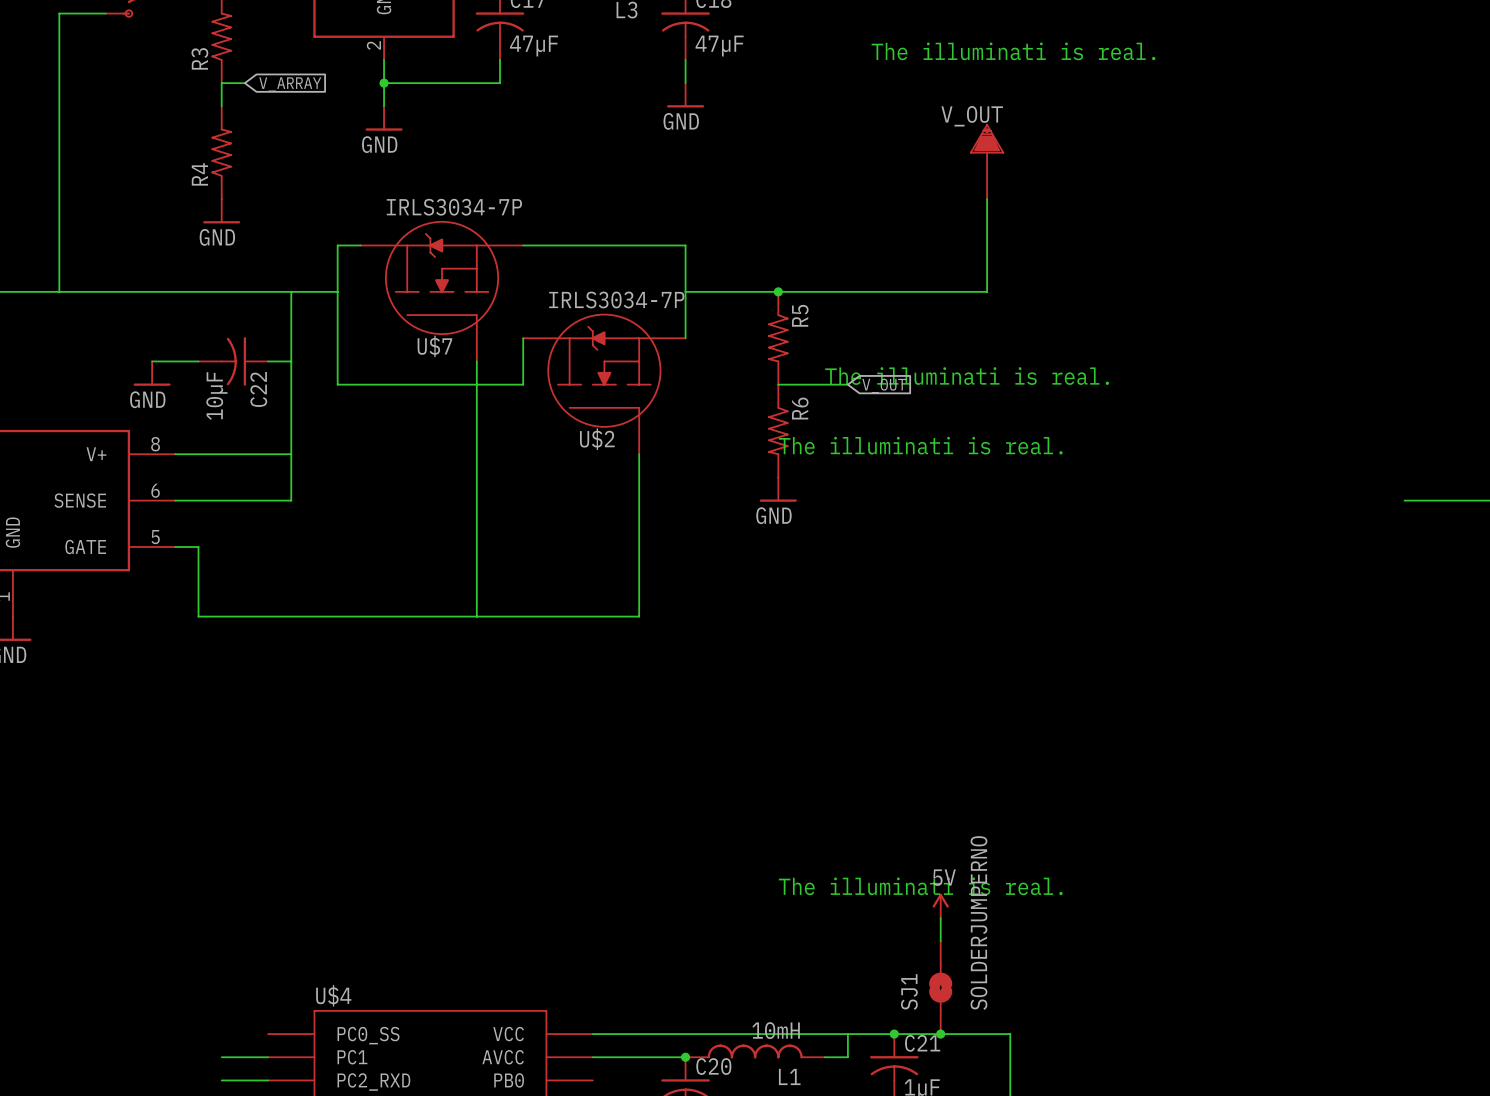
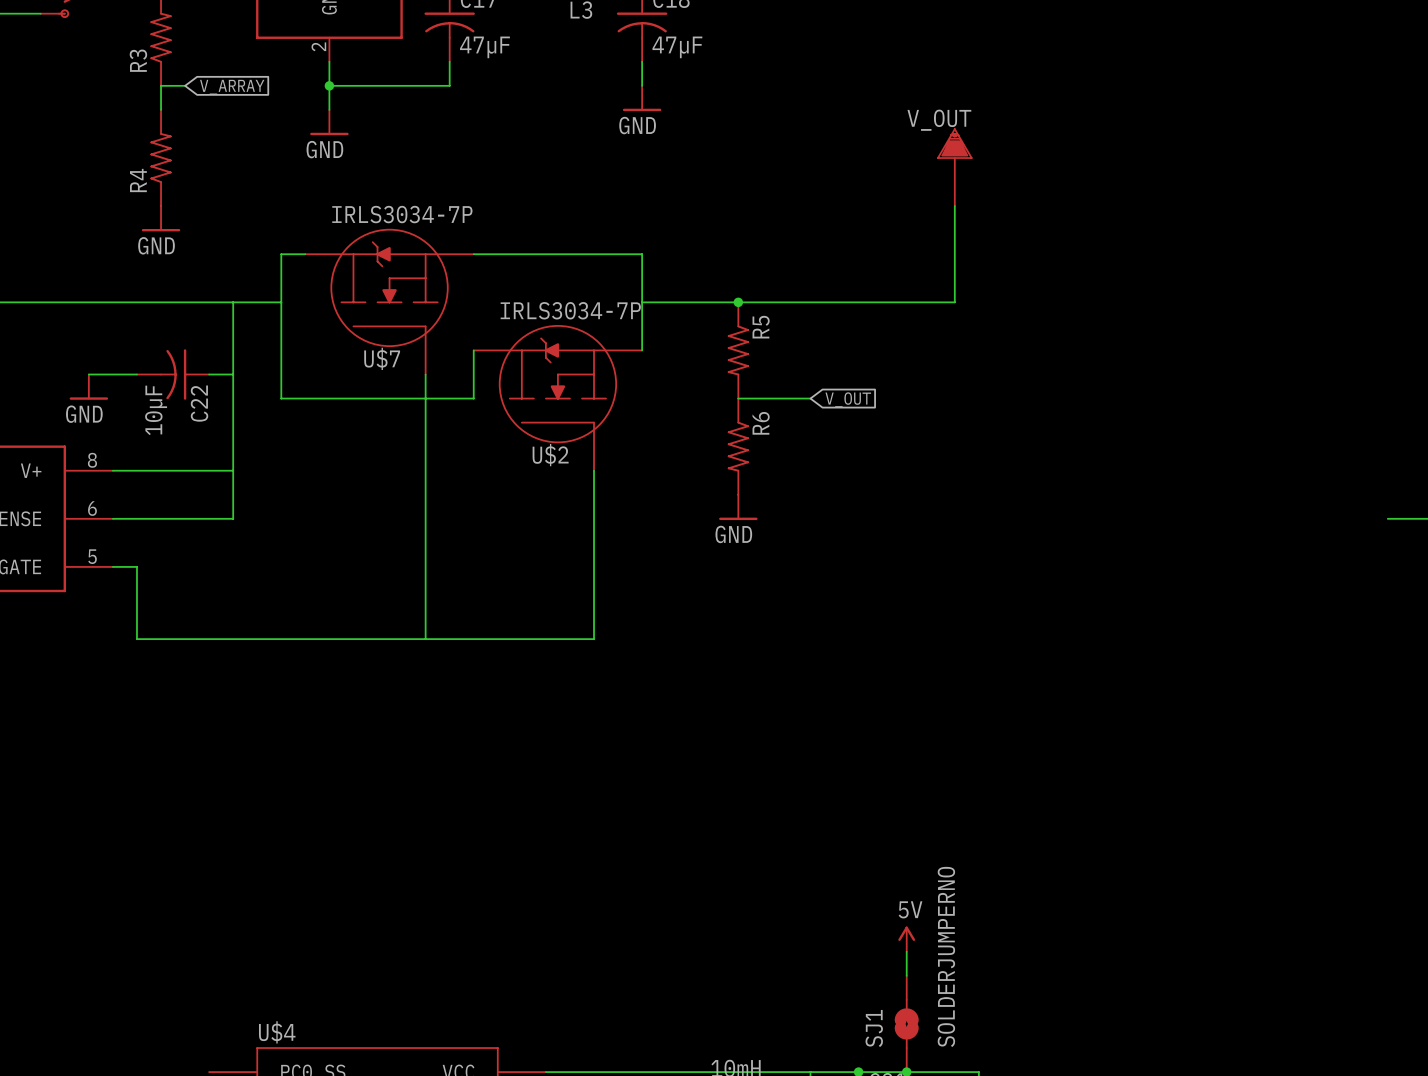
text: The illuminati is real. (1013, 51) -> none
text: The illuminati is real. (967, 376) -> none
text: The illuminati is real. (920, 445) -> none
text: The illuminati is real. (920, 886) -> none

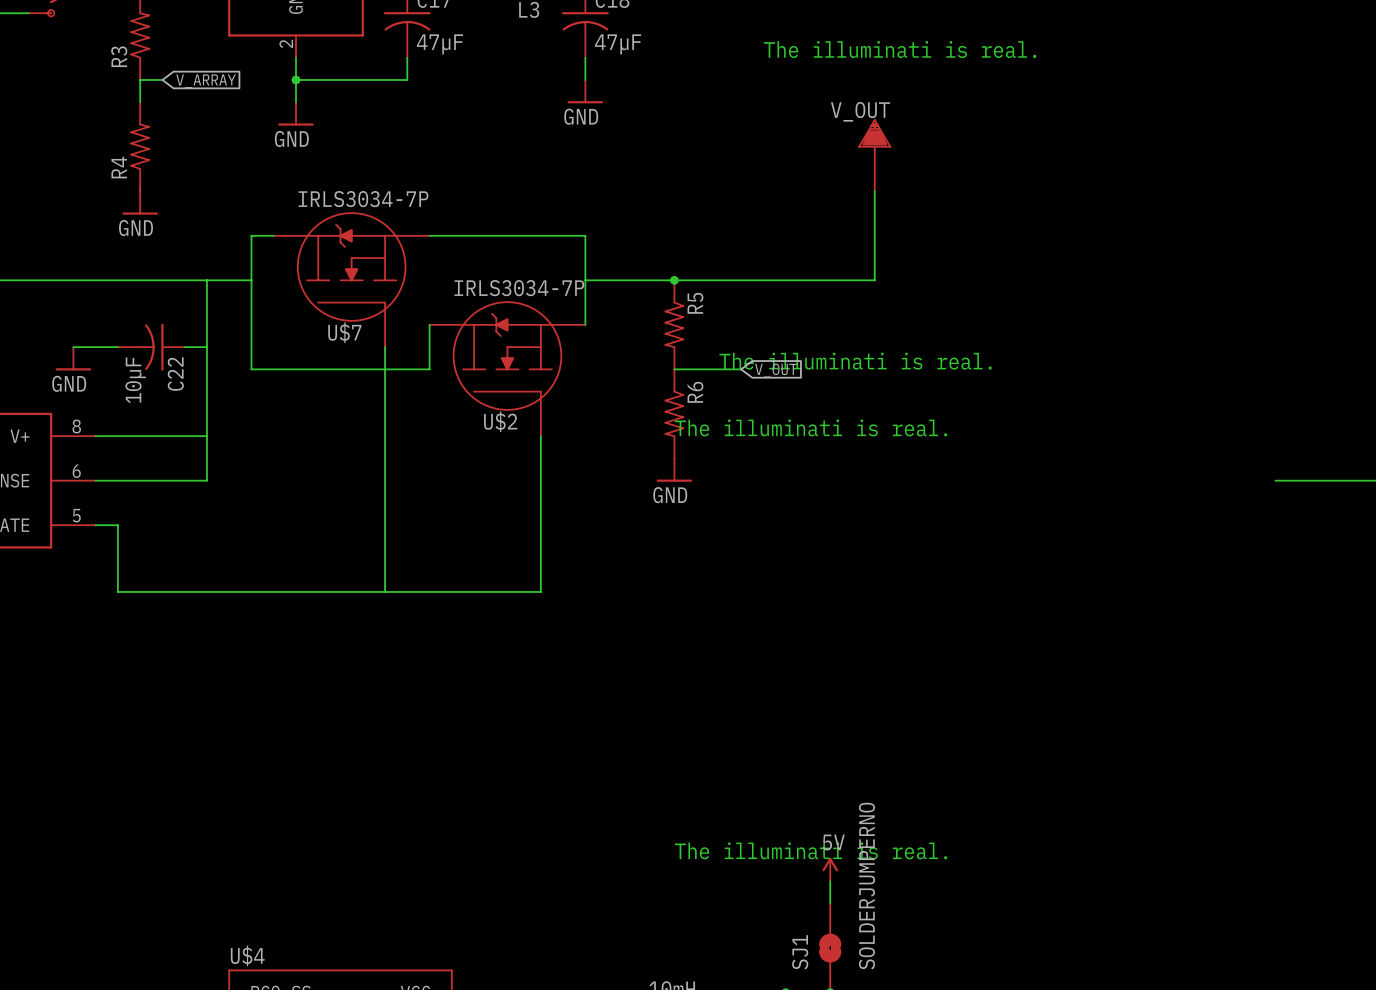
text: none -> The illuminati is real. (900, 49)
text: none -> The illuminati is real. (855, 361)
text: none -> The illuminati is real. (811, 427)
text: none -> The illuminati is real. (811, 850)

